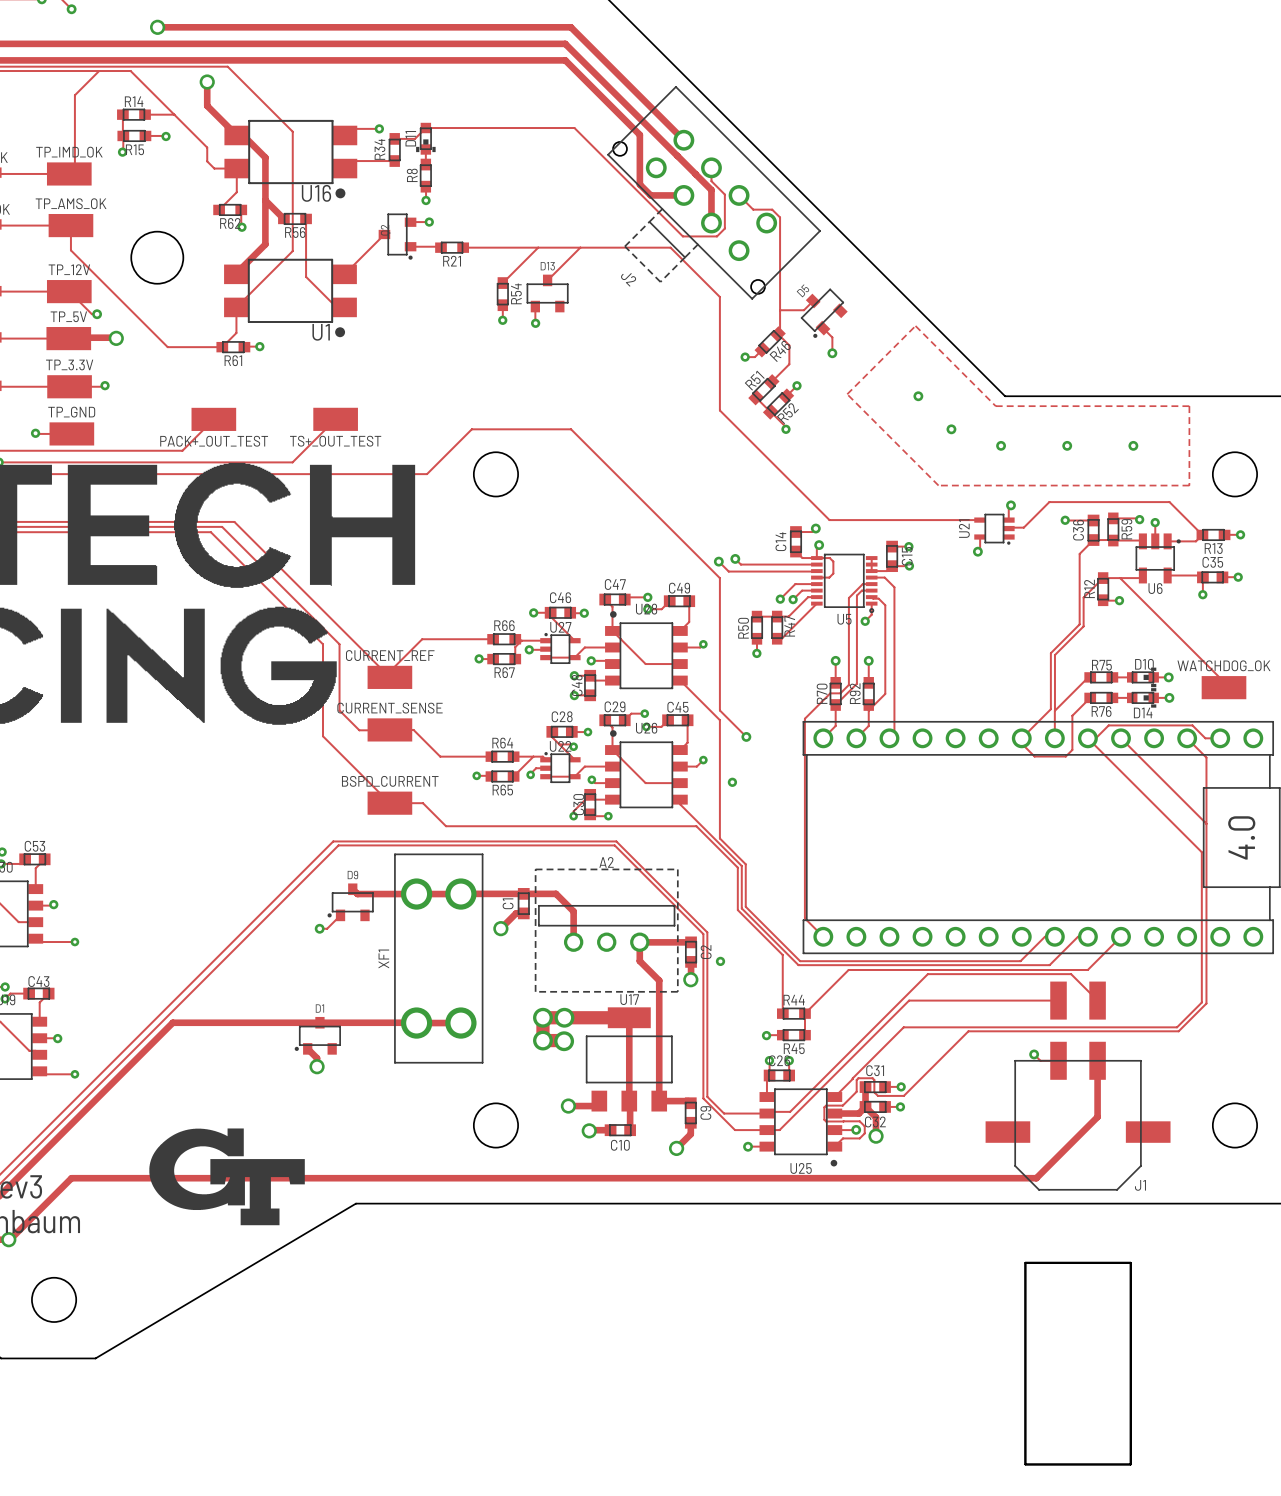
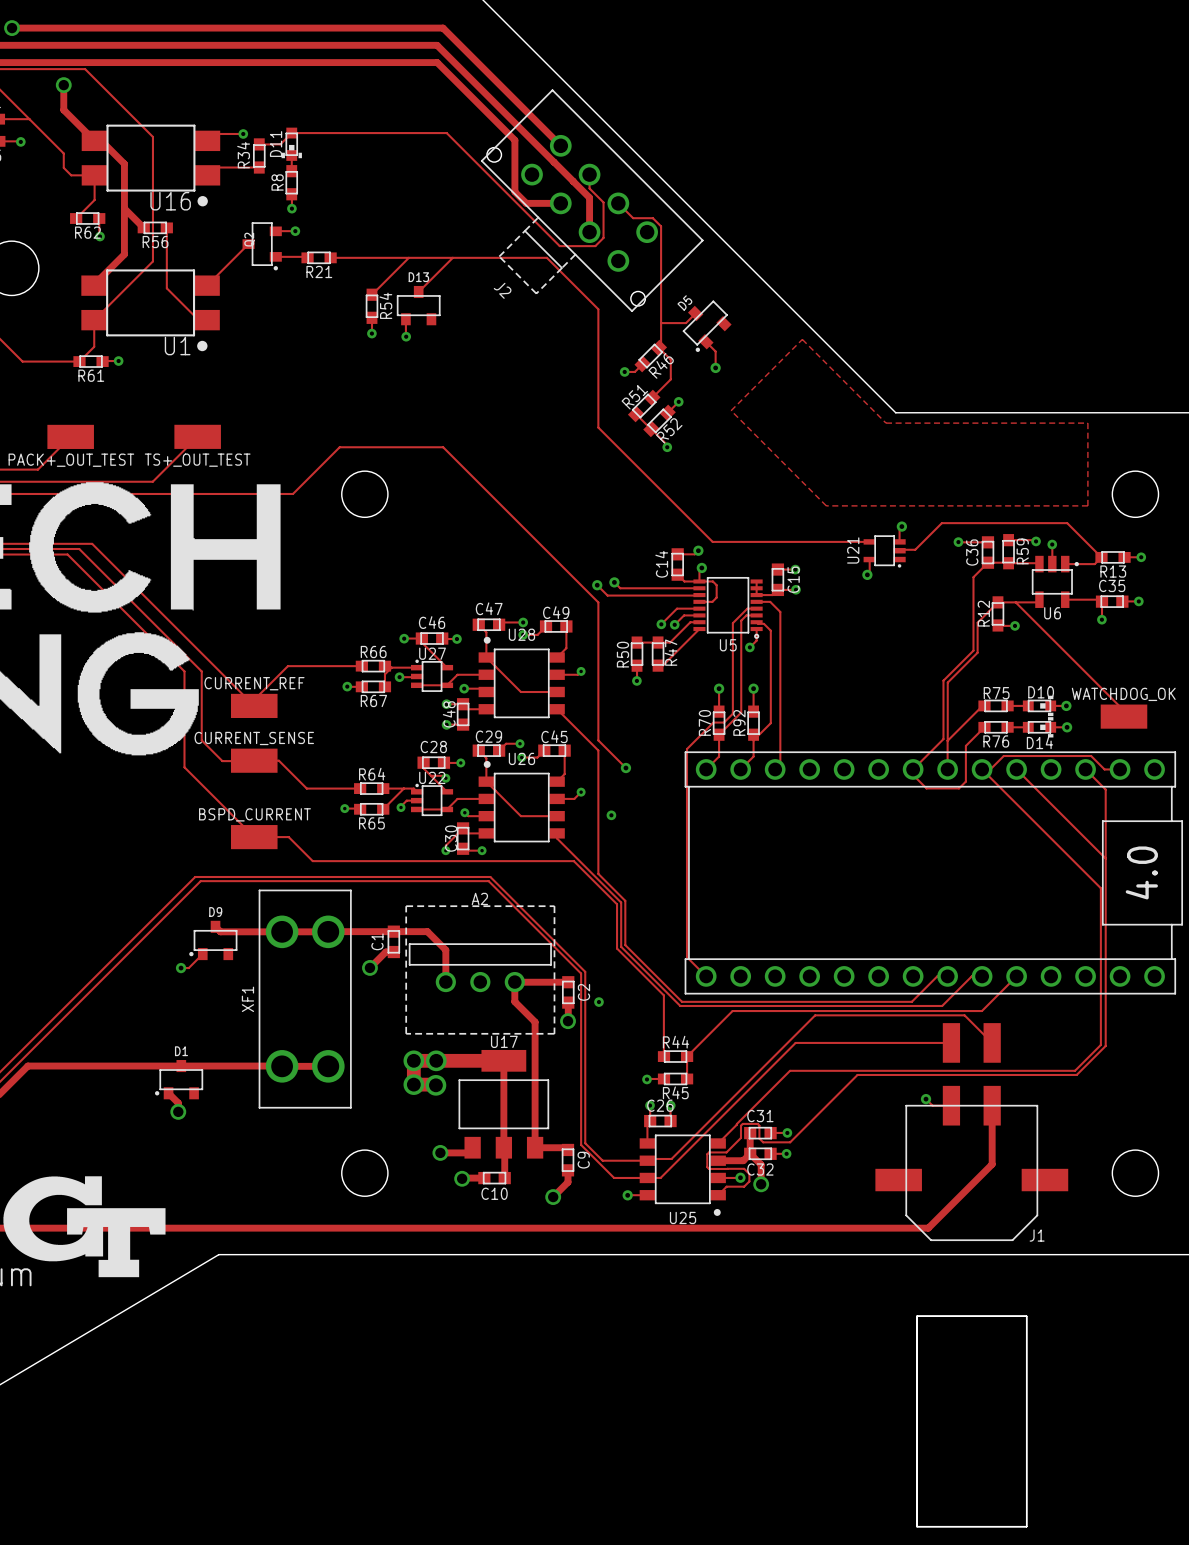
via: (918, 396) -> none
via: (951, 429) -> none
via: (1001, 445) -> none
via: (1067, 445) -> none
via: (1133, 445) -> none

